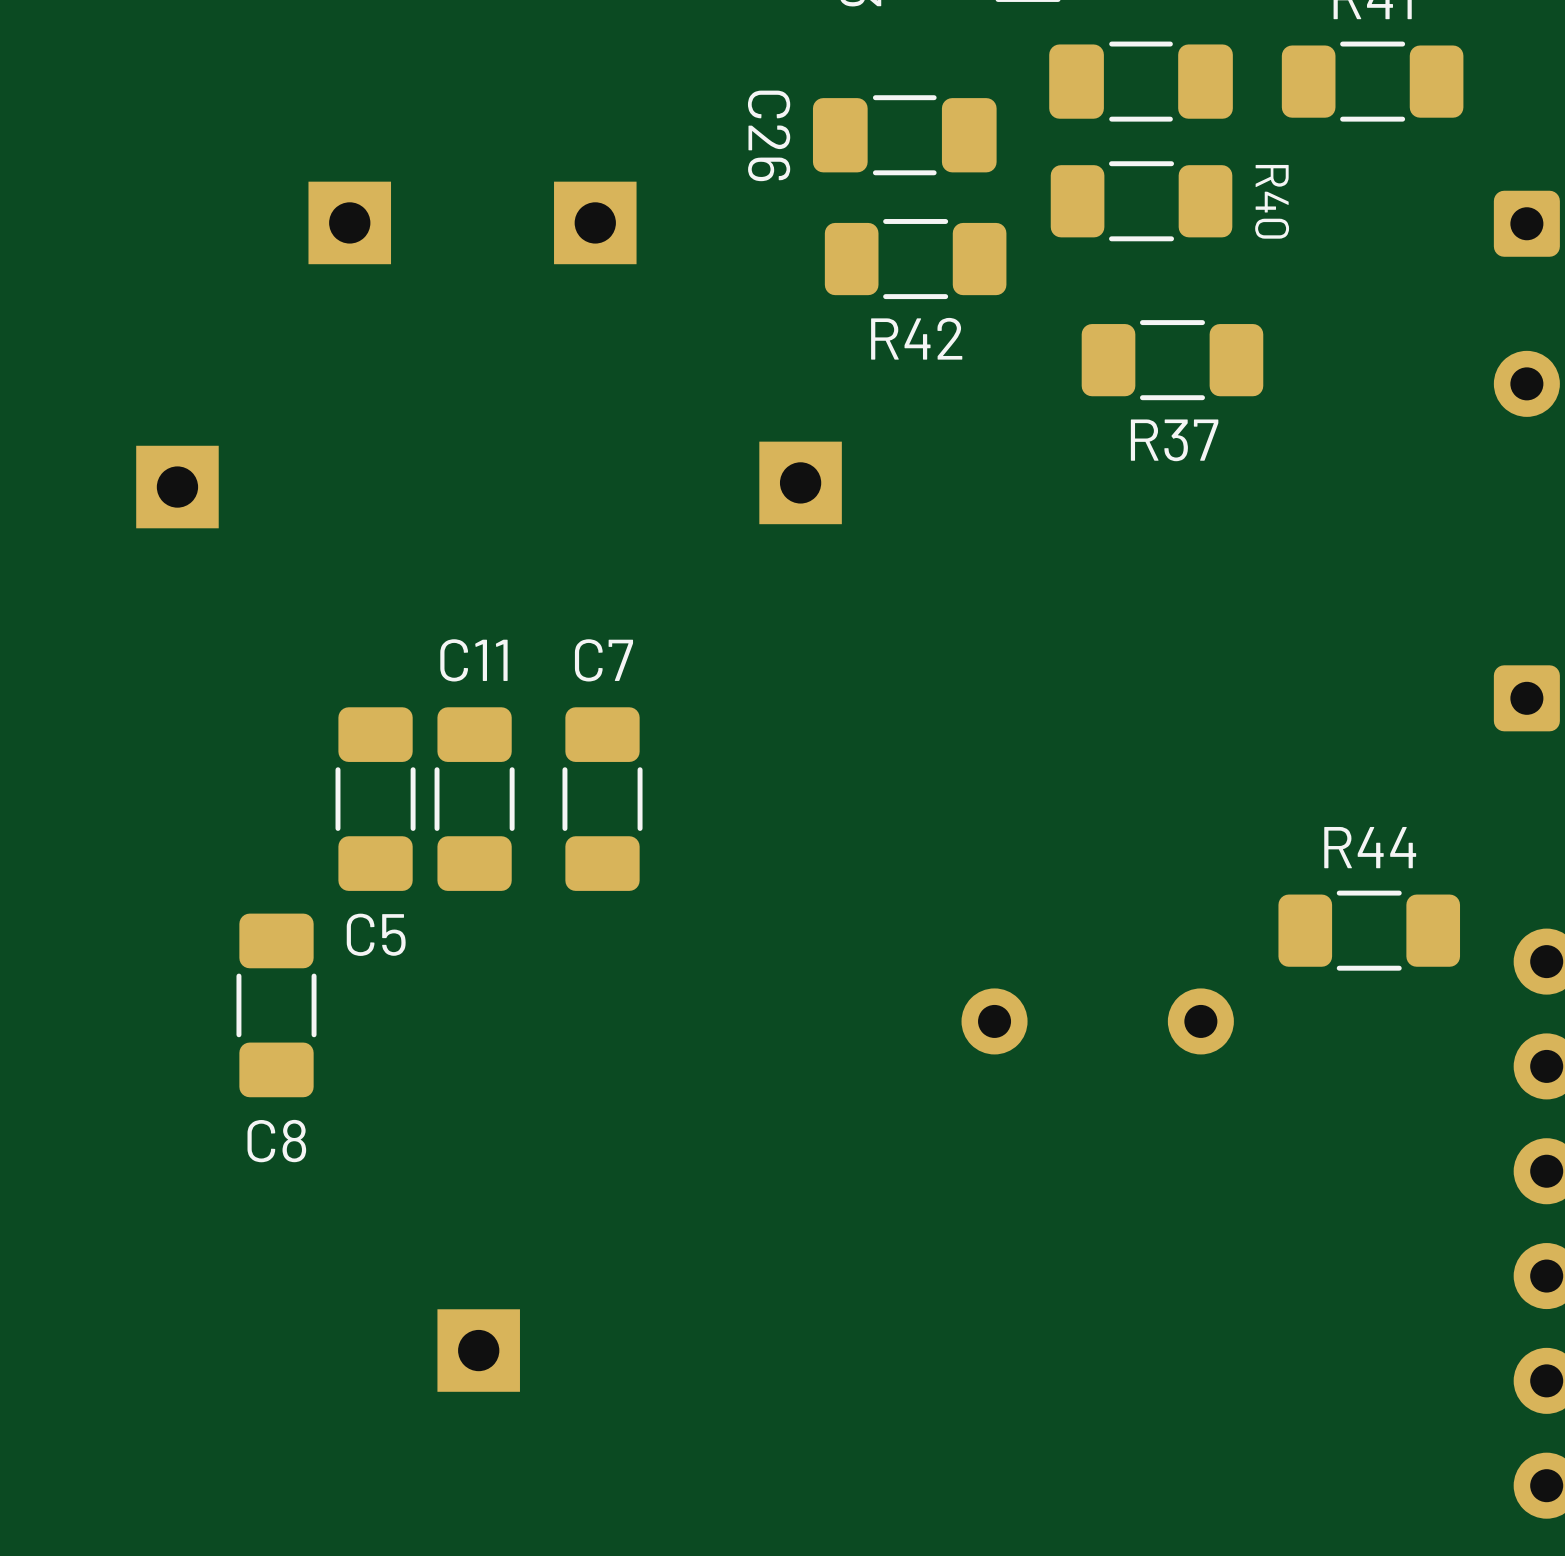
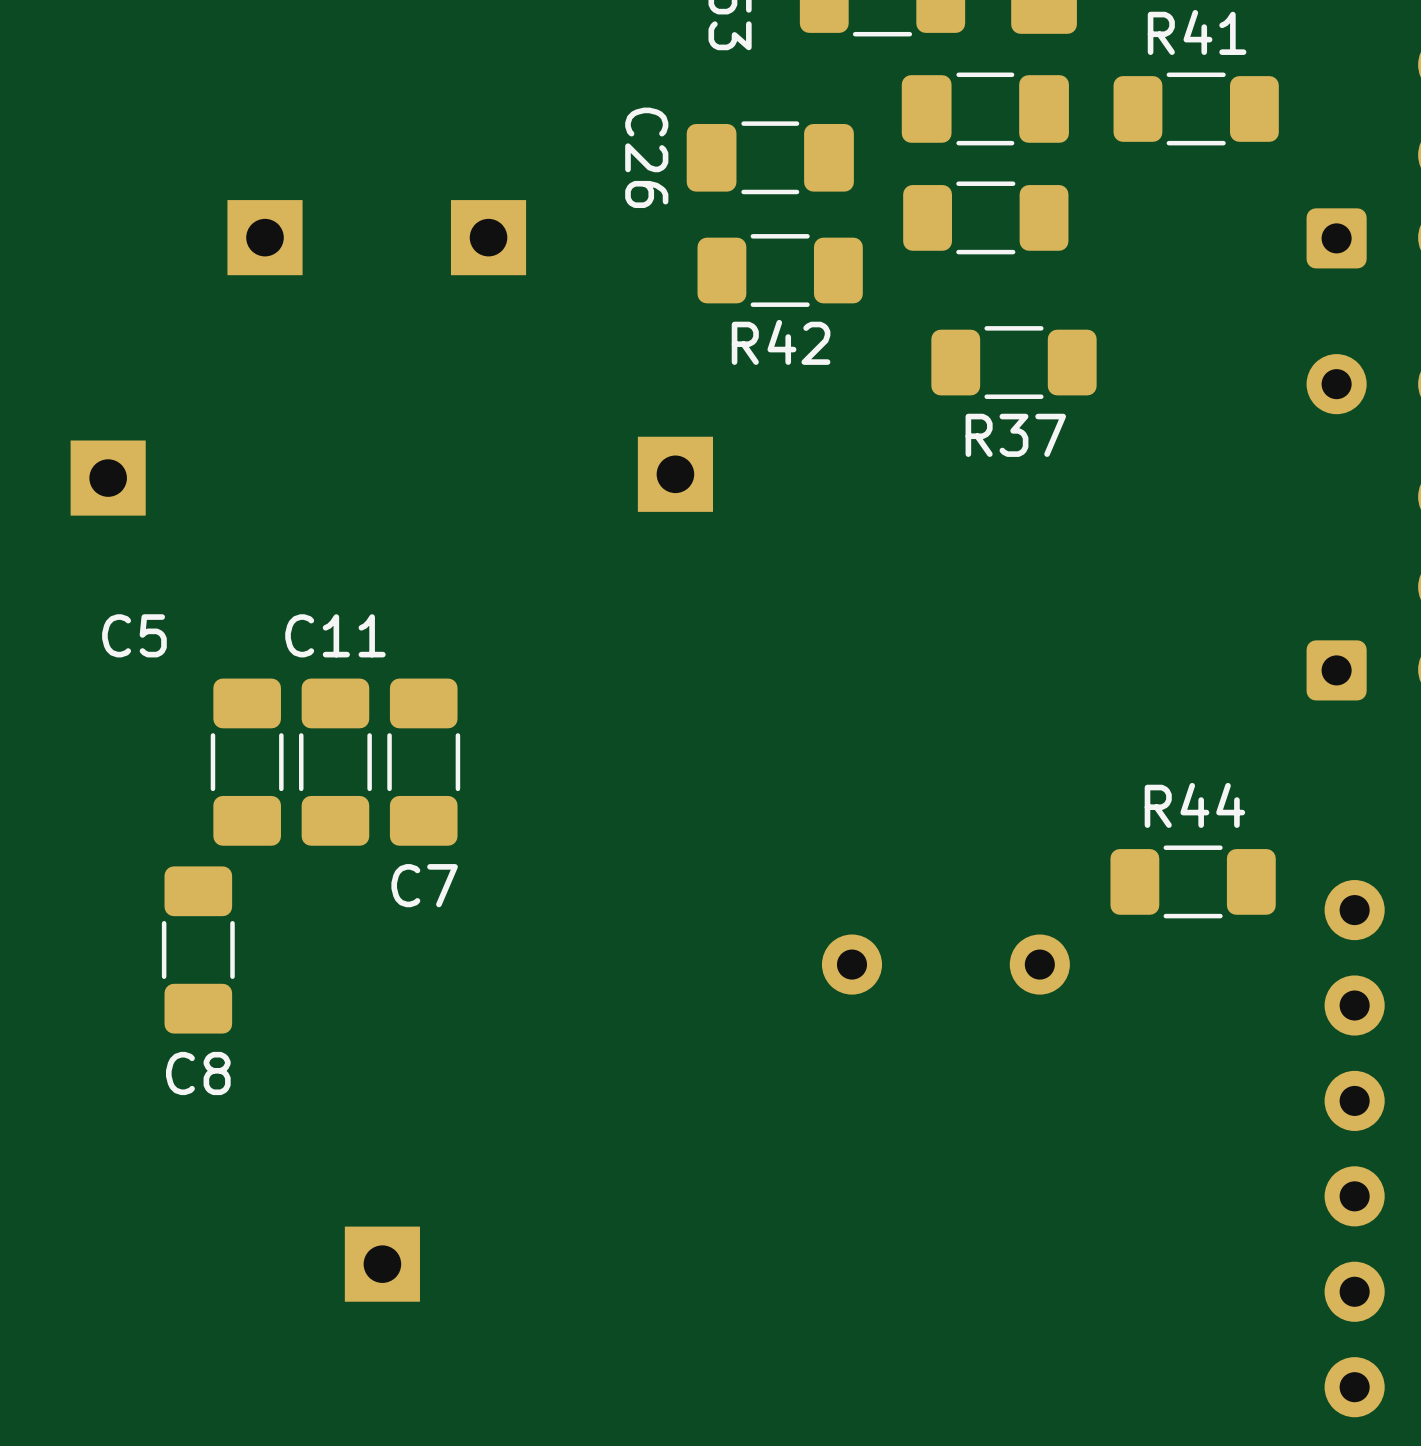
R40 name: R40 (1272, 201) -> none
C7 name position: C7 (603, 660) -> C7 (424, 885)
C5 position: (375, 799) -> (247, 762)
C11 position: (474, 799) -> (335, 762)
C7 position: (602, 799) -> (423, 762)
C5 name position: C5 (376, 934) -> C5 (134, 635)

